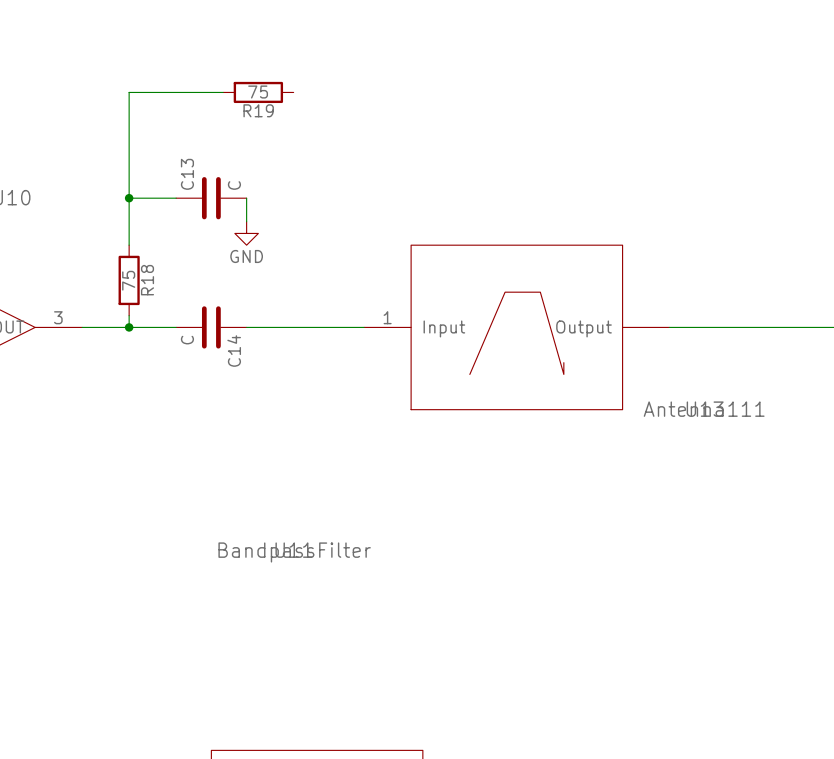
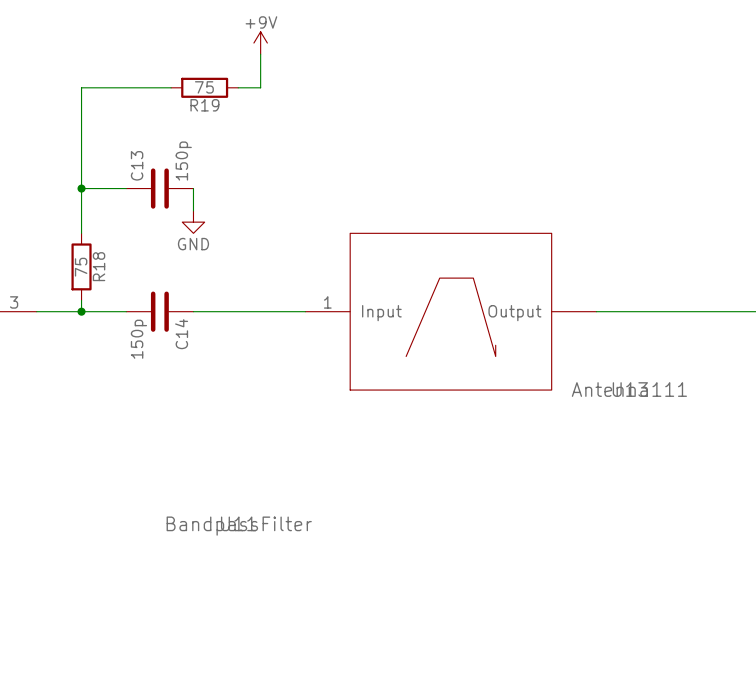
power symbol: none -> +9V (260, 43)
wire: none -> (260, 54) (260, 87) (238, 87)
C13 value: C (234, 185) -> 150p (183, 161)
C14 value: C (187, 340) -> 150p (138, 339)

